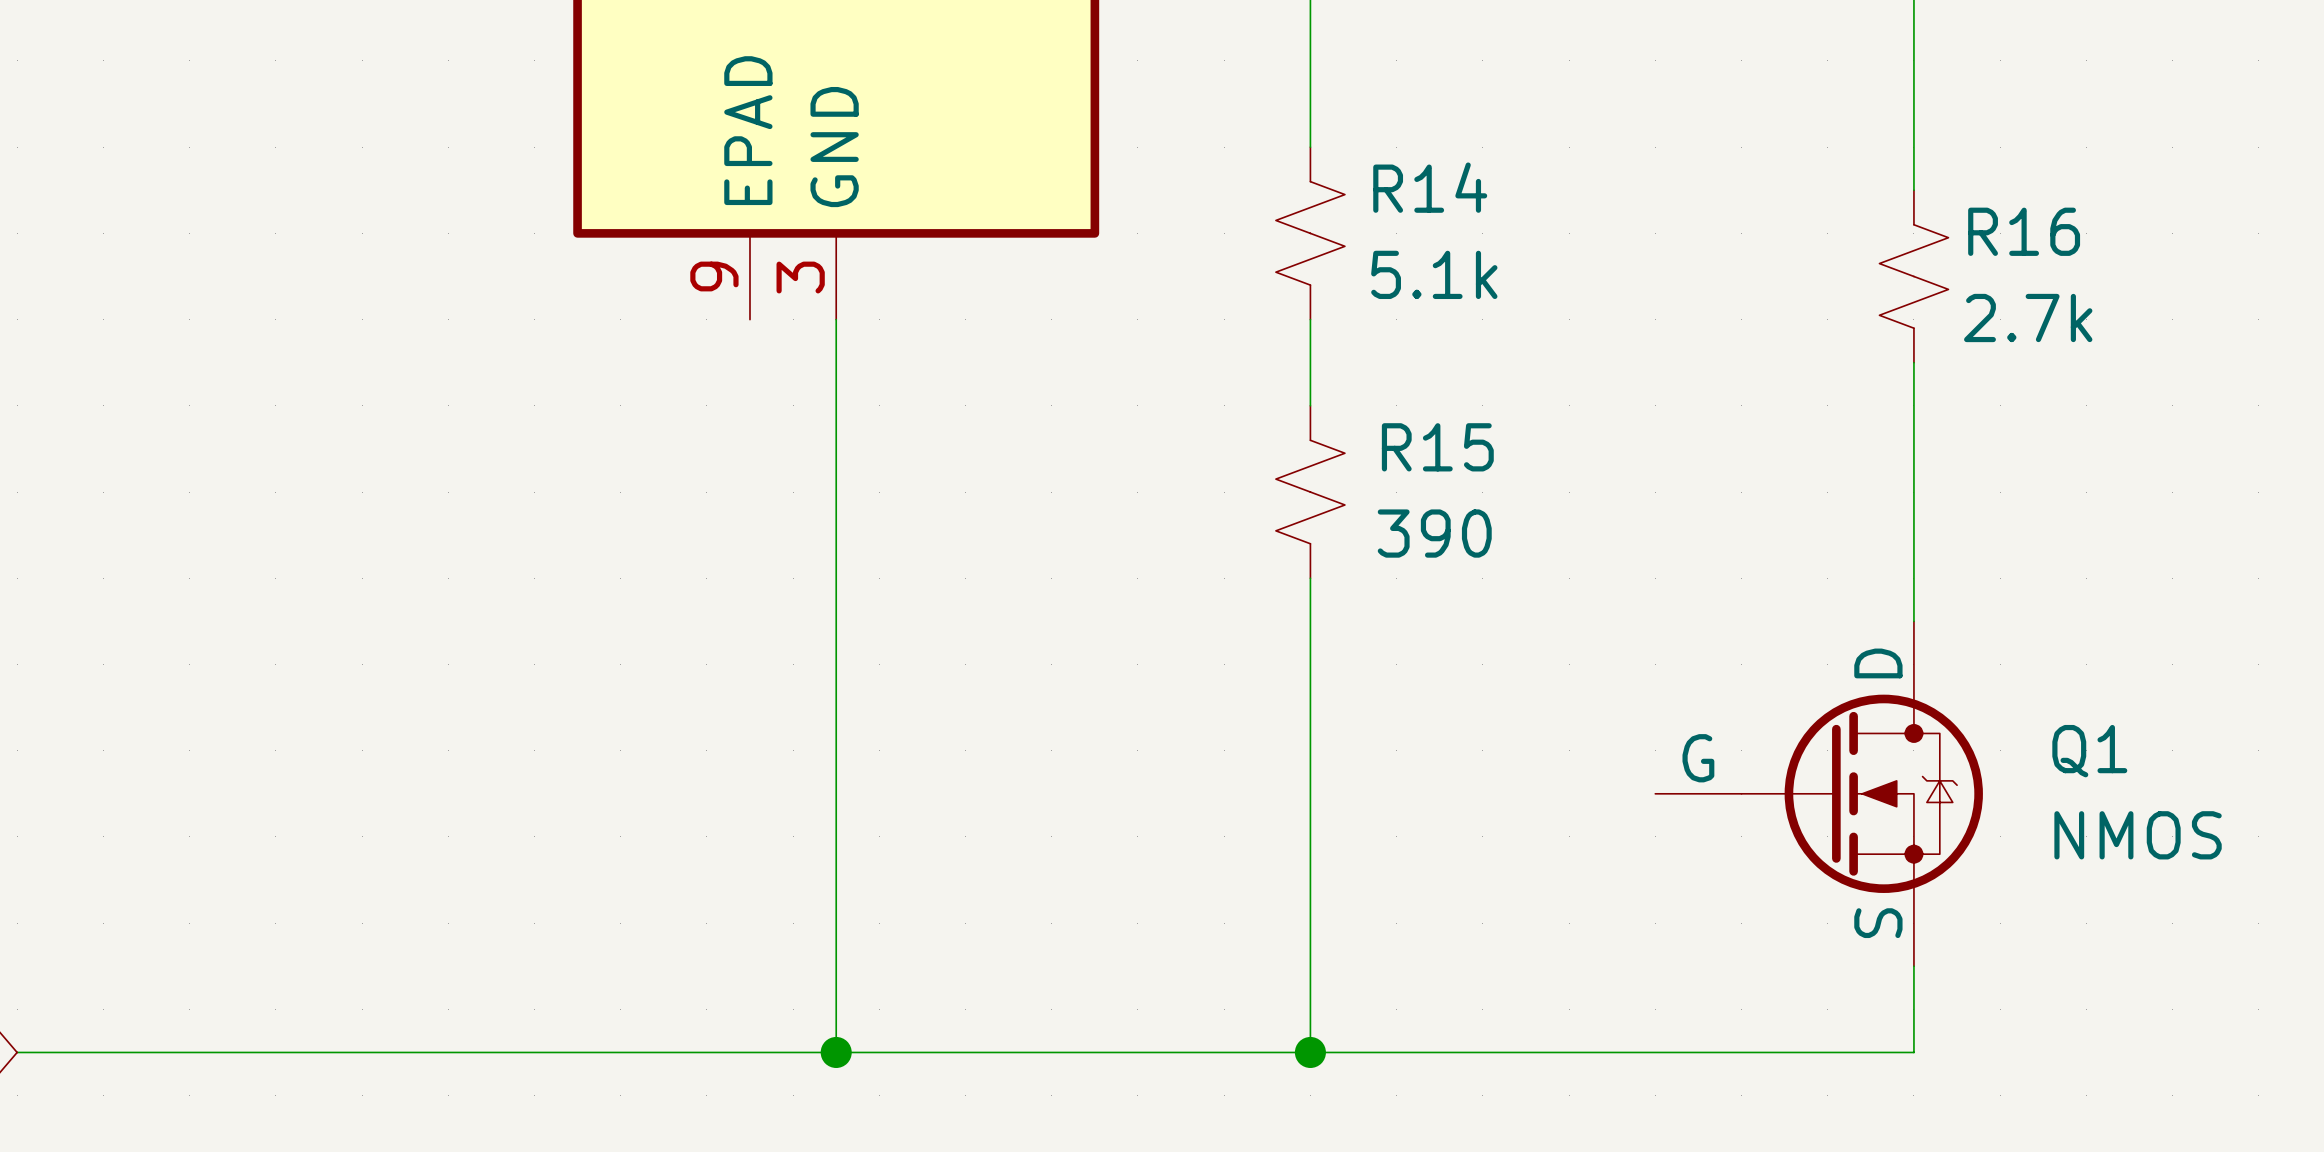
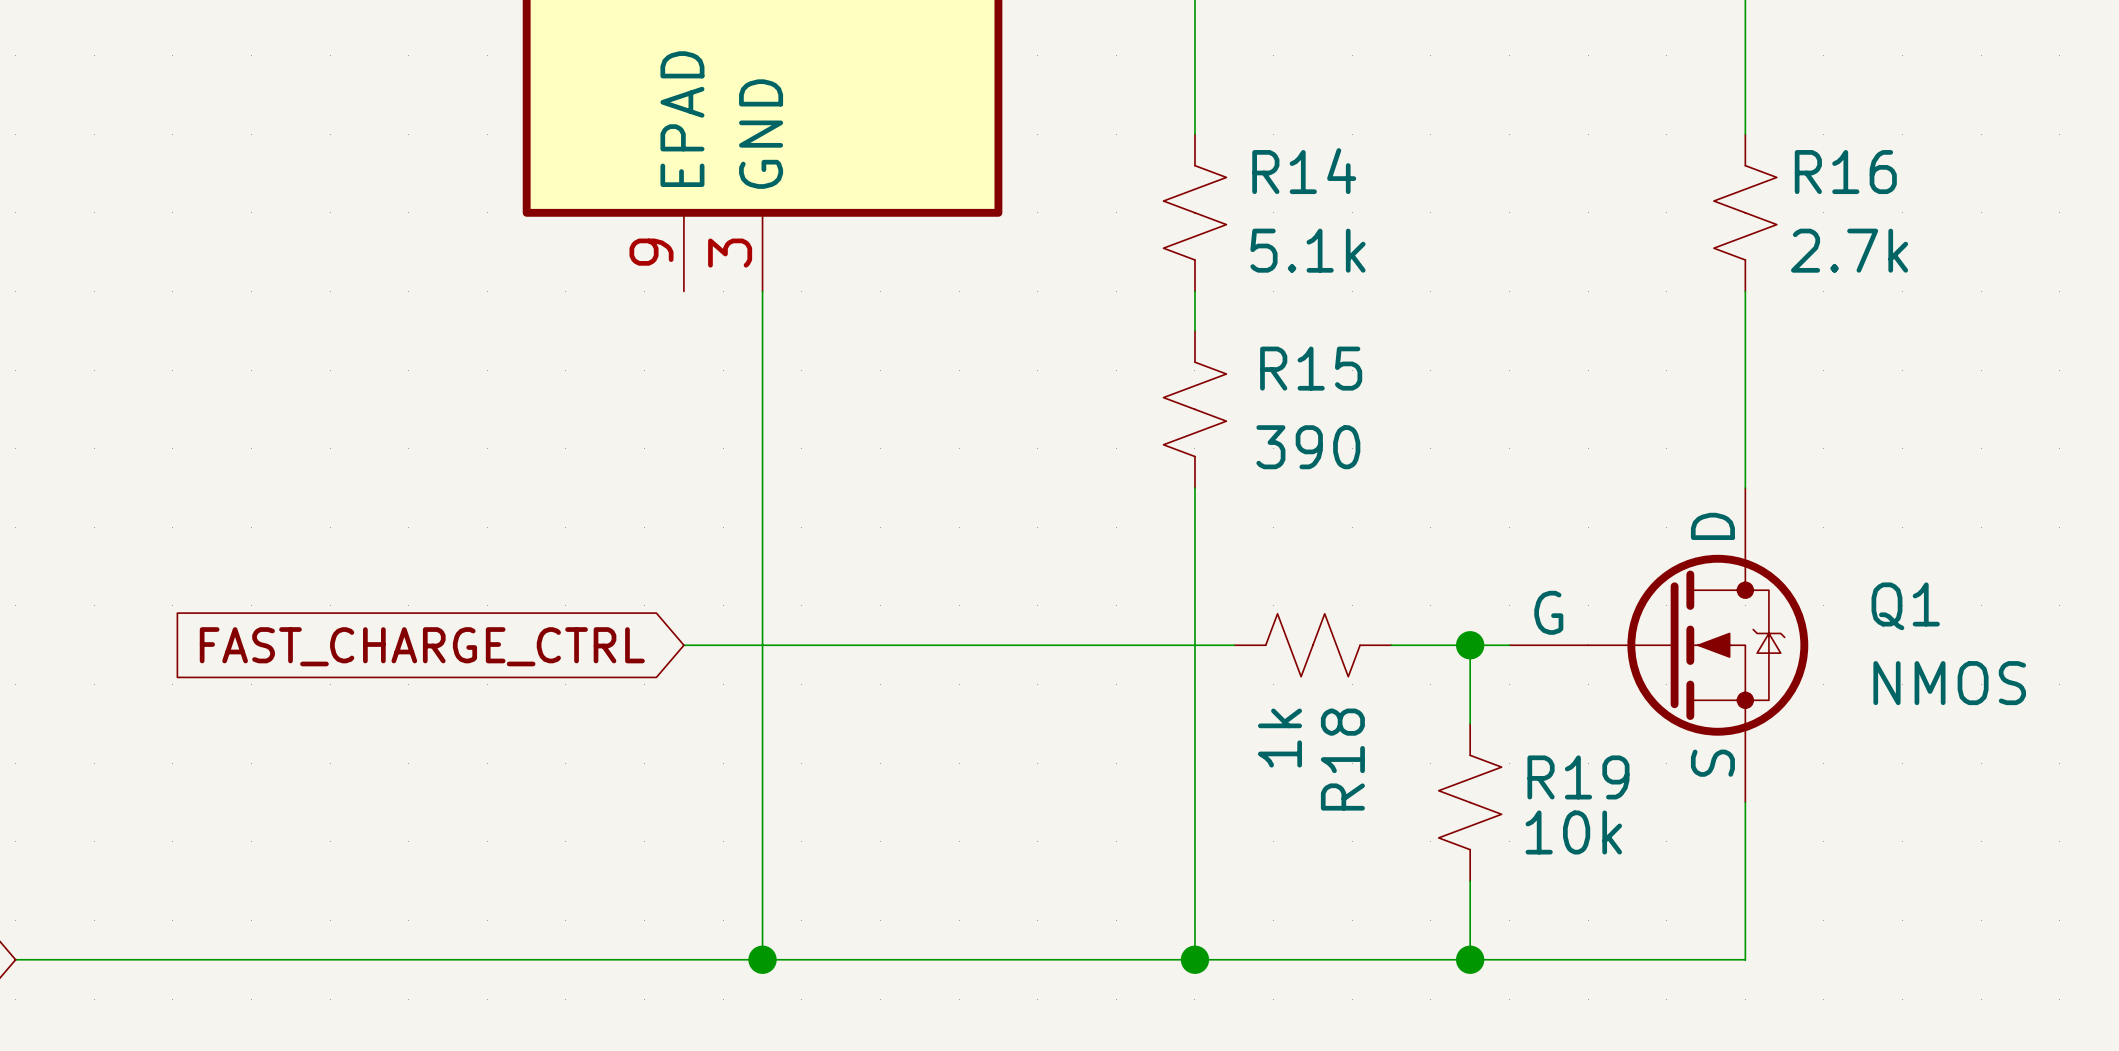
R16 position: (1913, 276) -> (1745, 212)
R15 position: (1310, 492) -> (1194, 409)
wire: none -> (683, 645) (1234, 645)
R18: none -> 1k (1312, 645)
wire: none -> (1391, 645) (1509, 645)
wire: none -> (1470, 645) (1470, 723)
junction: none -> (1470, 645)
global label: none -> FAST_CHARGE_CTRL (422, 646)
Q1 position: (1819, 793) -> (1658, 645)
R19: none -> 10k (1470, 802)
wire: none -> (1470, 881) (1470, 959)
junction: none -> (1470, 959)

